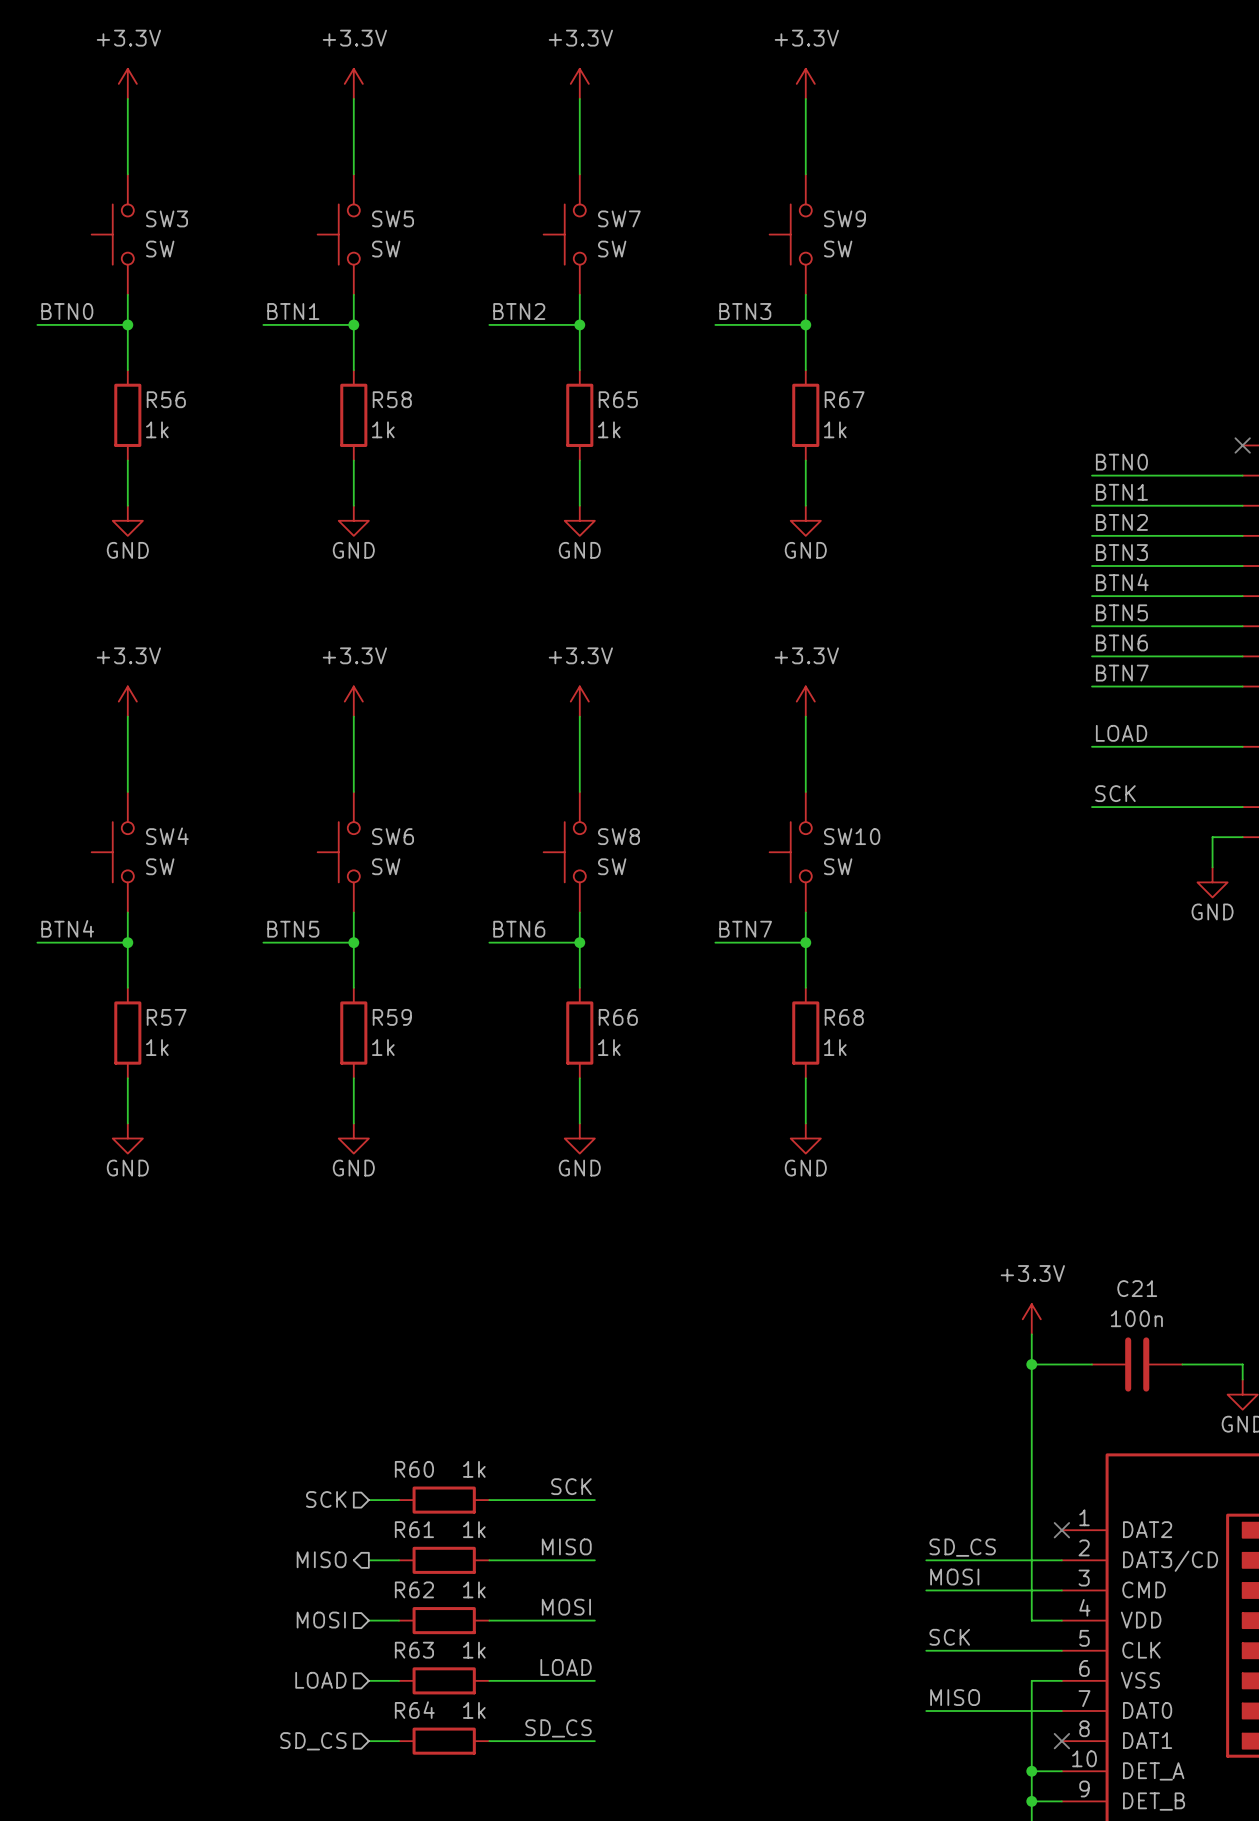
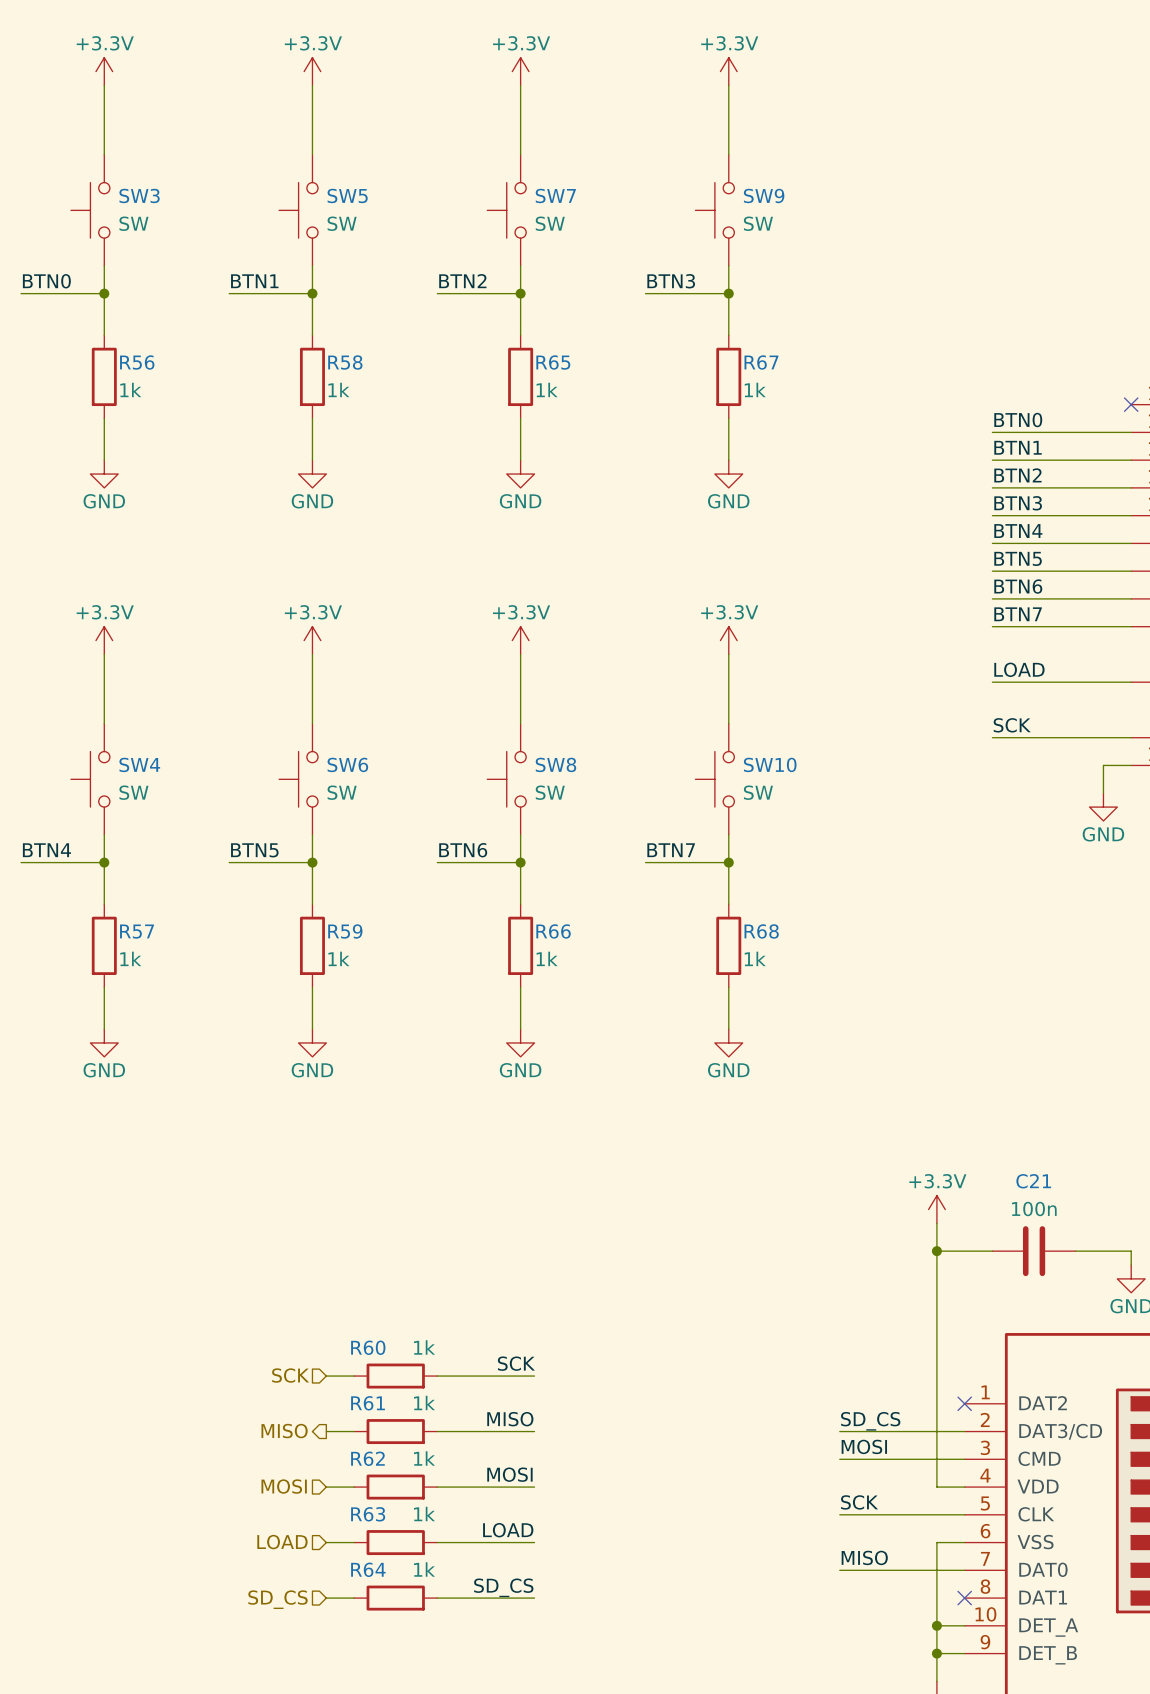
power symbol text position: +3.3V (128, 38) -> +3.3V (105, 43)
power symbol text position: +3.3V (354, 38) -> +3.3V (313, 43)
power symbol text position: +3.3V (580, 38) -> +3.3V (521, 43)
power symbol text position: +3.3V (806, 38) -> +3.3V (729, 43)
power symbol text position: +3.3V (128, 655) -> +3.3V (105, 612)
power symbol text position: +3.3V (354, 655) -> +3.3V (313, 612)
power symbol text position: +3.3V (580, 655) -> +3.3V (521, 612)
power symbol text position: +3.3V (806, 655) -> +3.3V (729, 612)
power symbol text position: +3.3V (1032, 1273) -> +3.3V (937, 1181)

